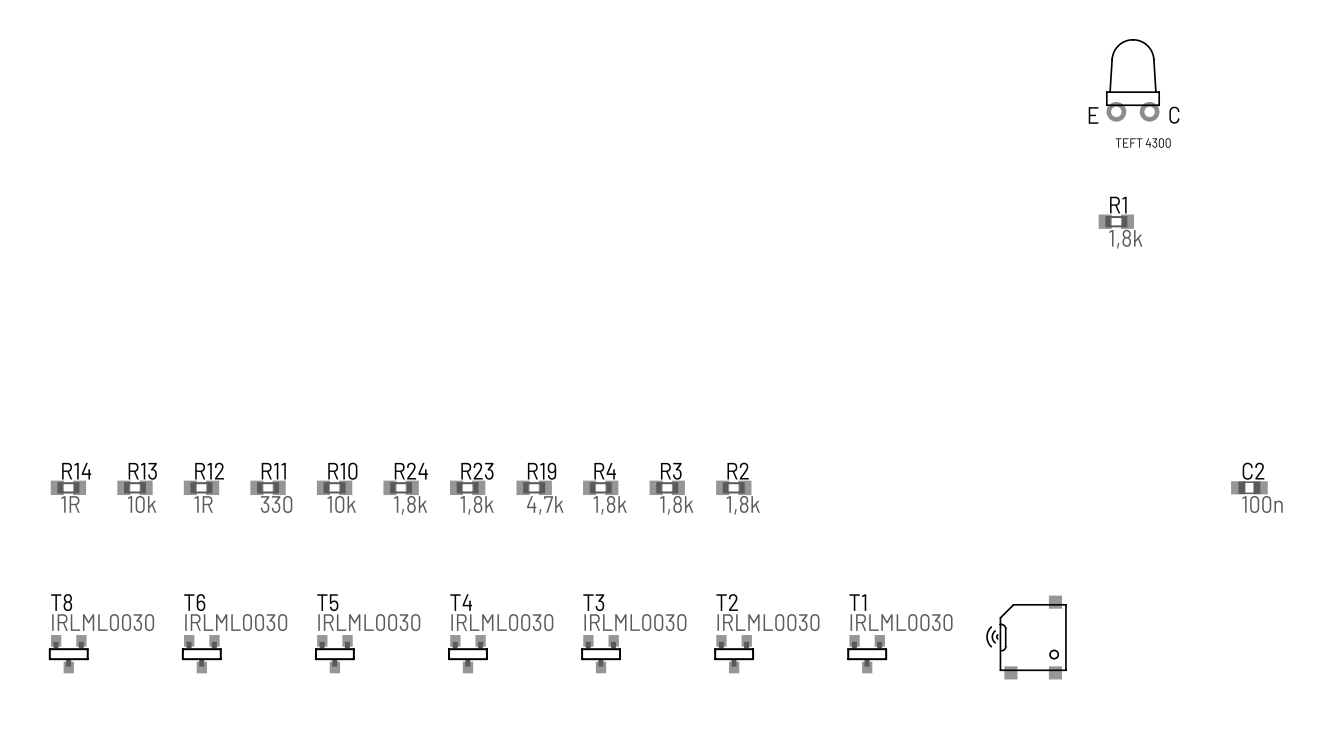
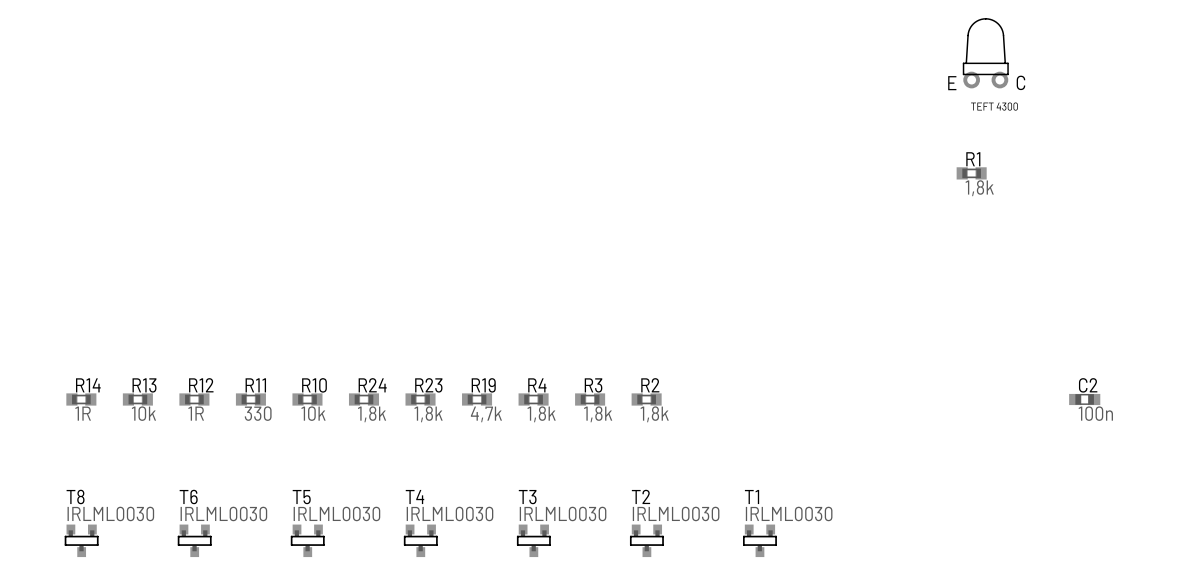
part: (1026, 637) -> none

